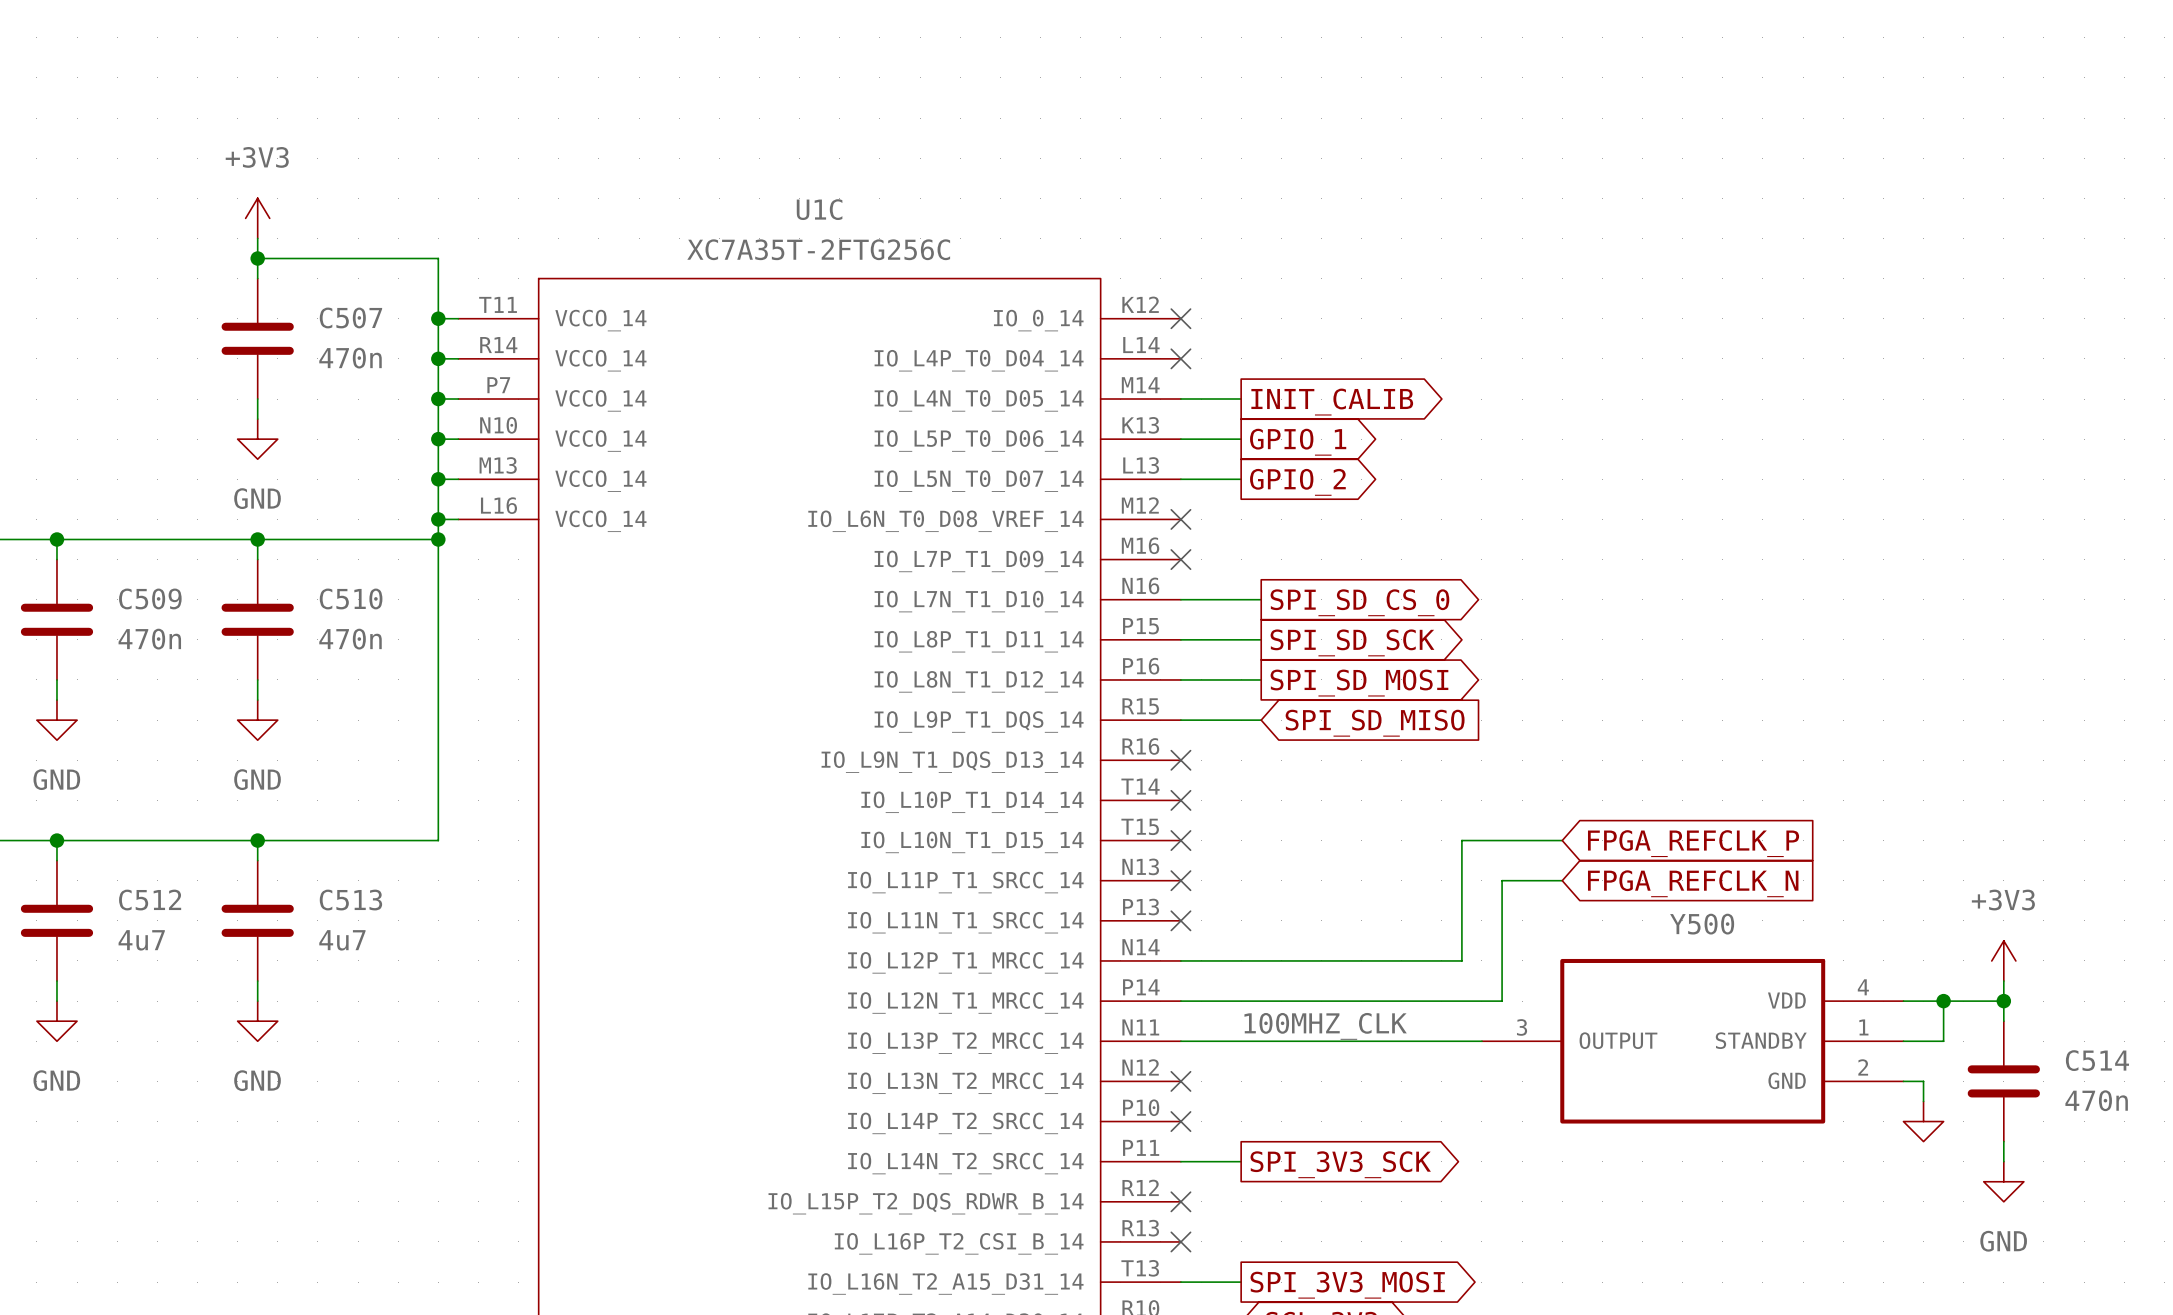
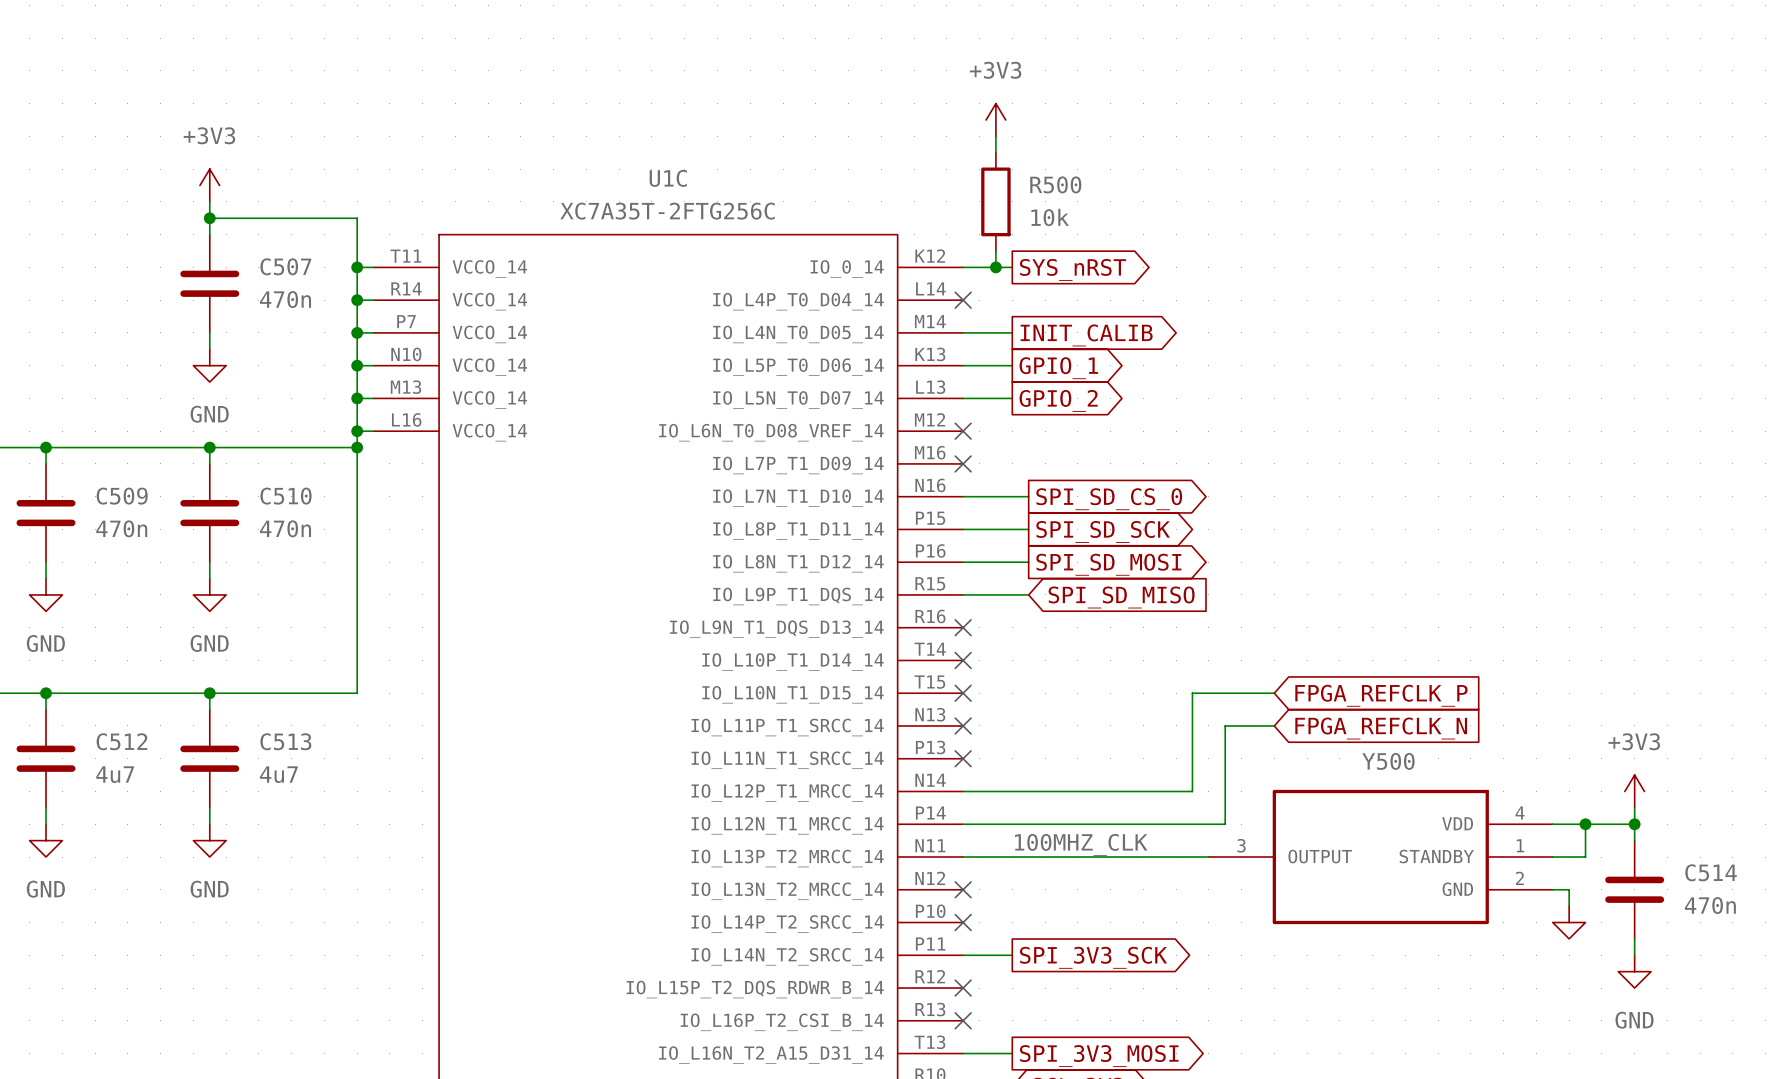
power symbol: none -> +3V3 (995, 120)
wire: none -> (995, 136) (995, 152)
R500: none -> 10k (995, 201)
wire: none -> (995, 251) (995, 267)
wire: none -> (963, 267) (1012, 267)
no-connect mark: (1180, 318) -> none
junction: none -> (995, 267)
global label: none -> SYS_nRST (1073, 269)

